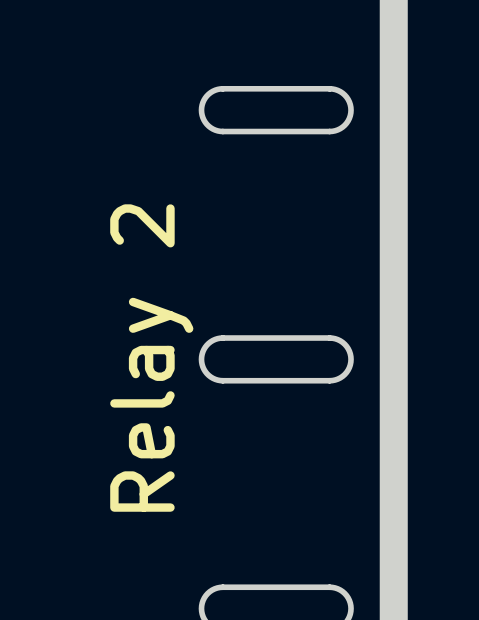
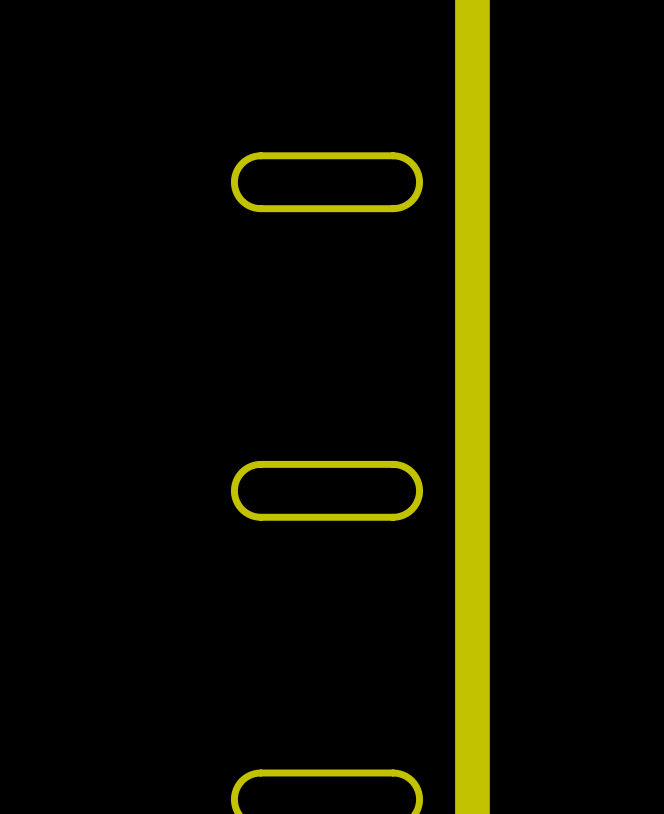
text: Relay 2 (151, 358) -> none

